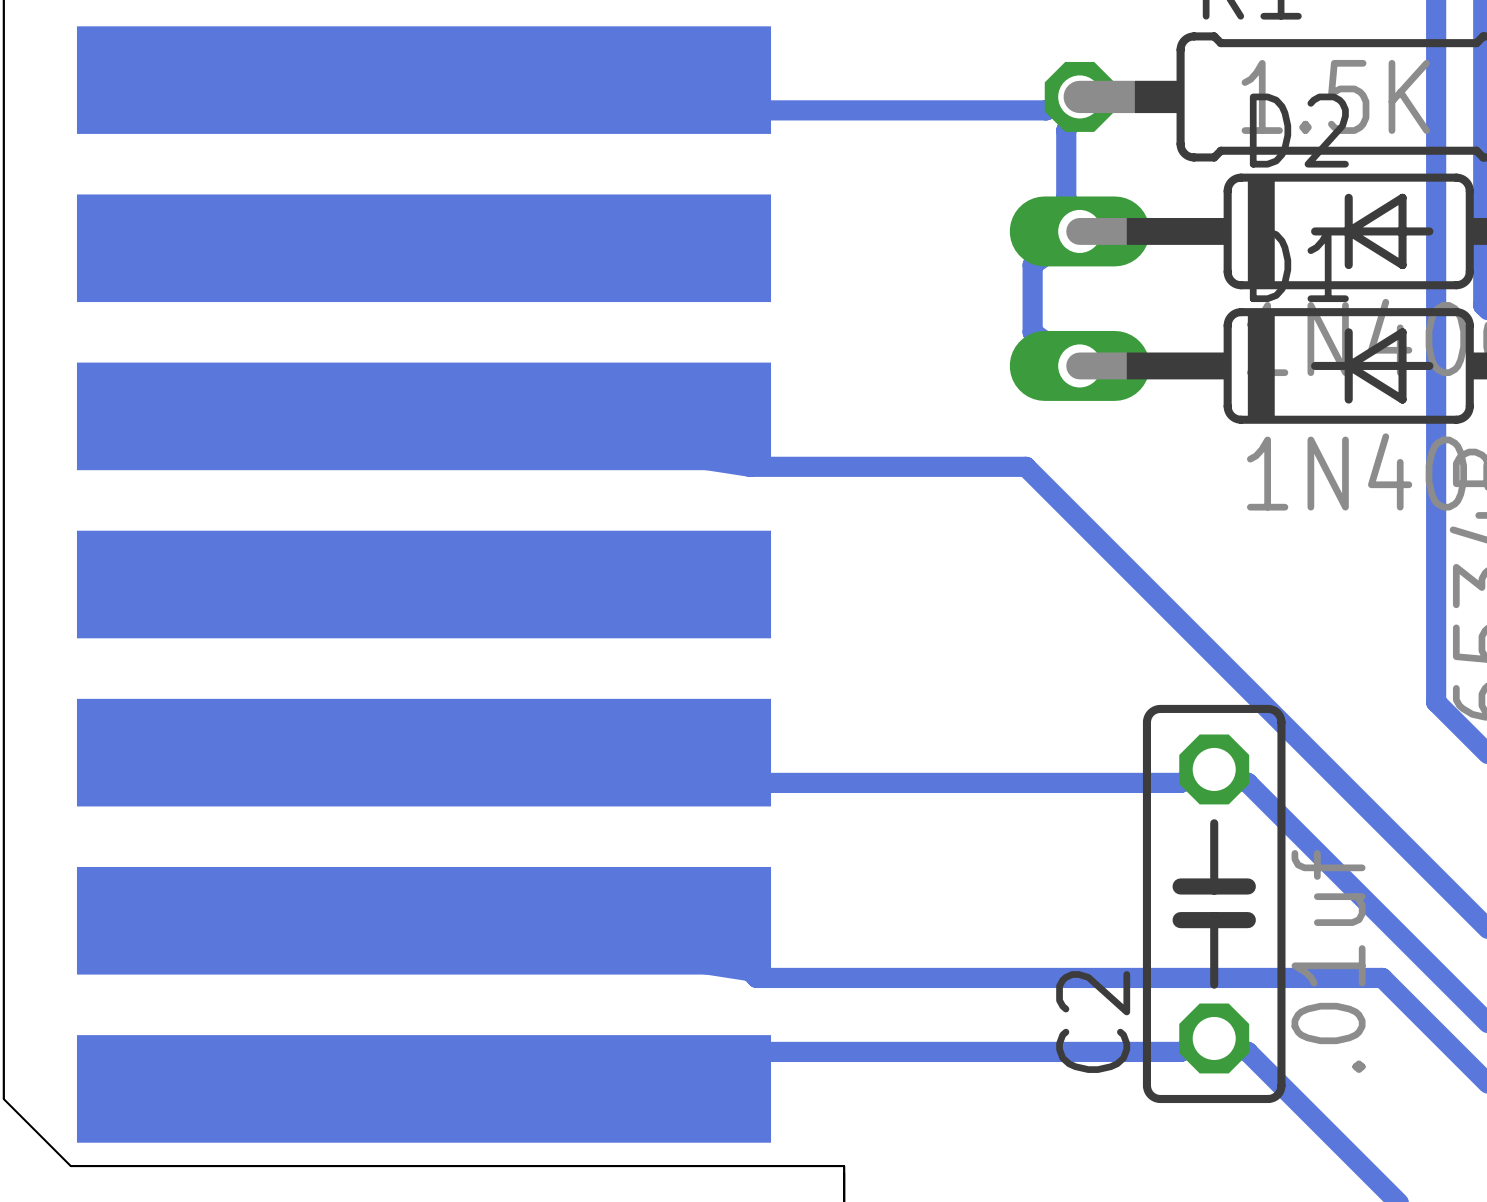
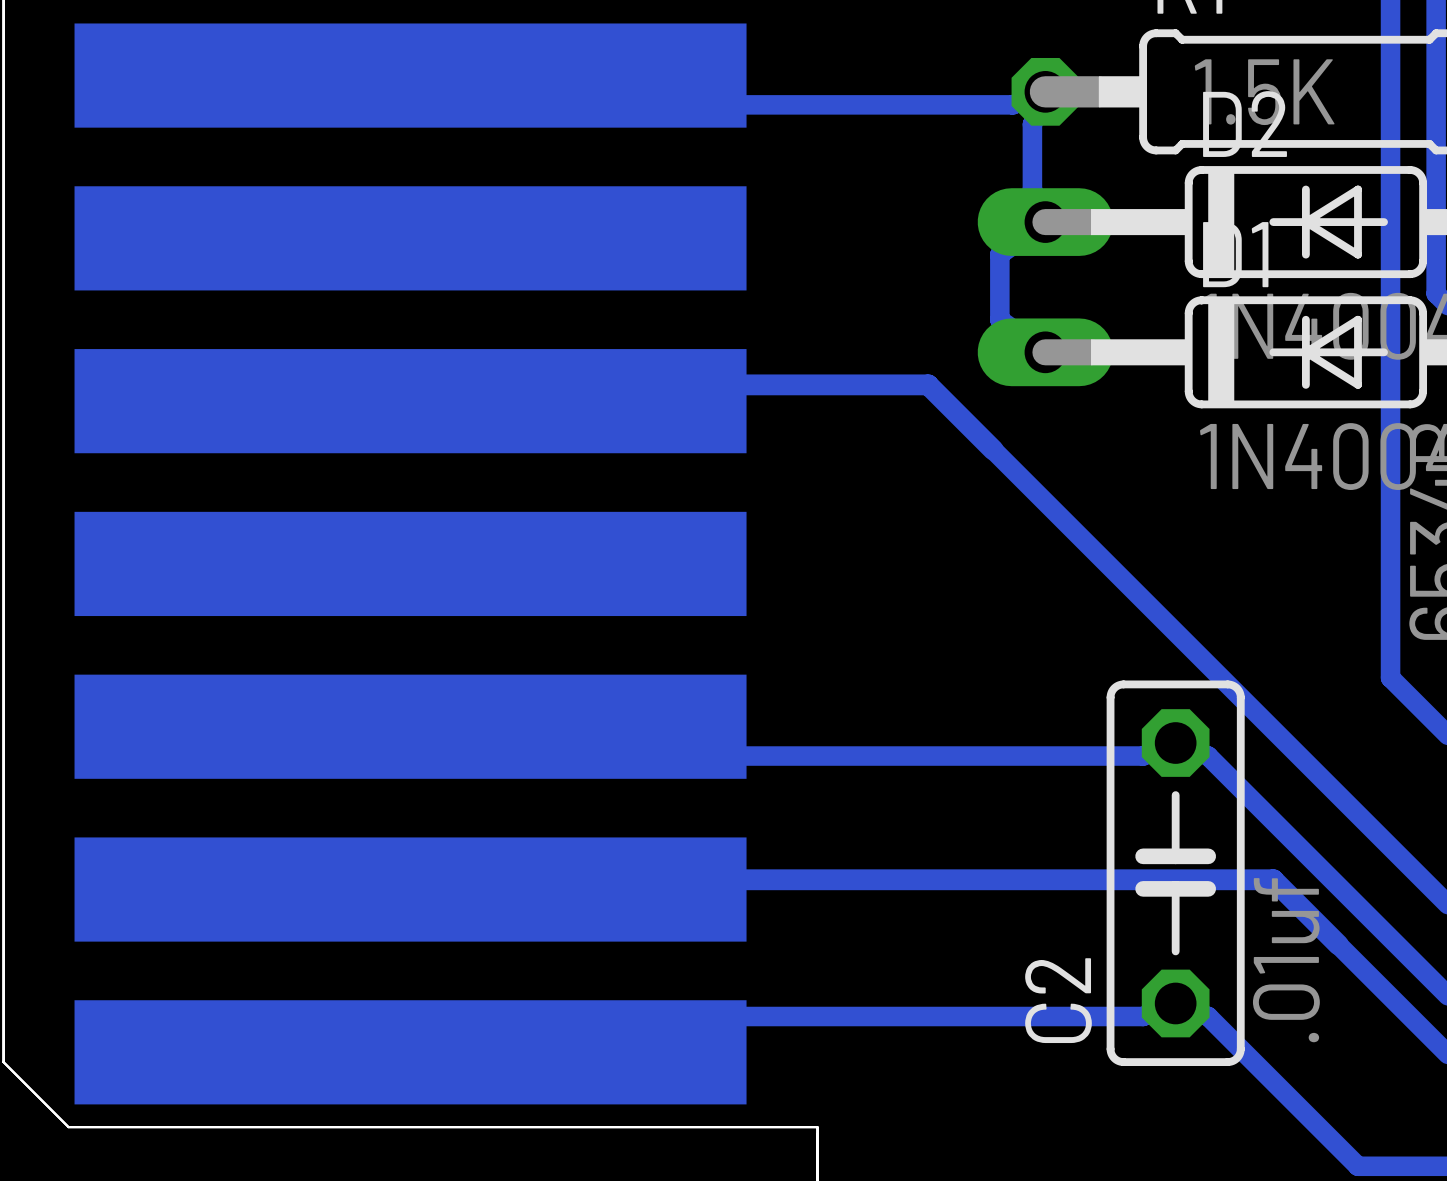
bottom track: (423, 416) (750, 466) (1025, 466) -> (410, 401) (661, 384) (928, 384) (993, 449)
bottom track: (423, 920) (750, 971) (756, 977) (1382, 977) -> (410, 889) (661, 873) (667, 879) (1273, 879) (1338, 944)

